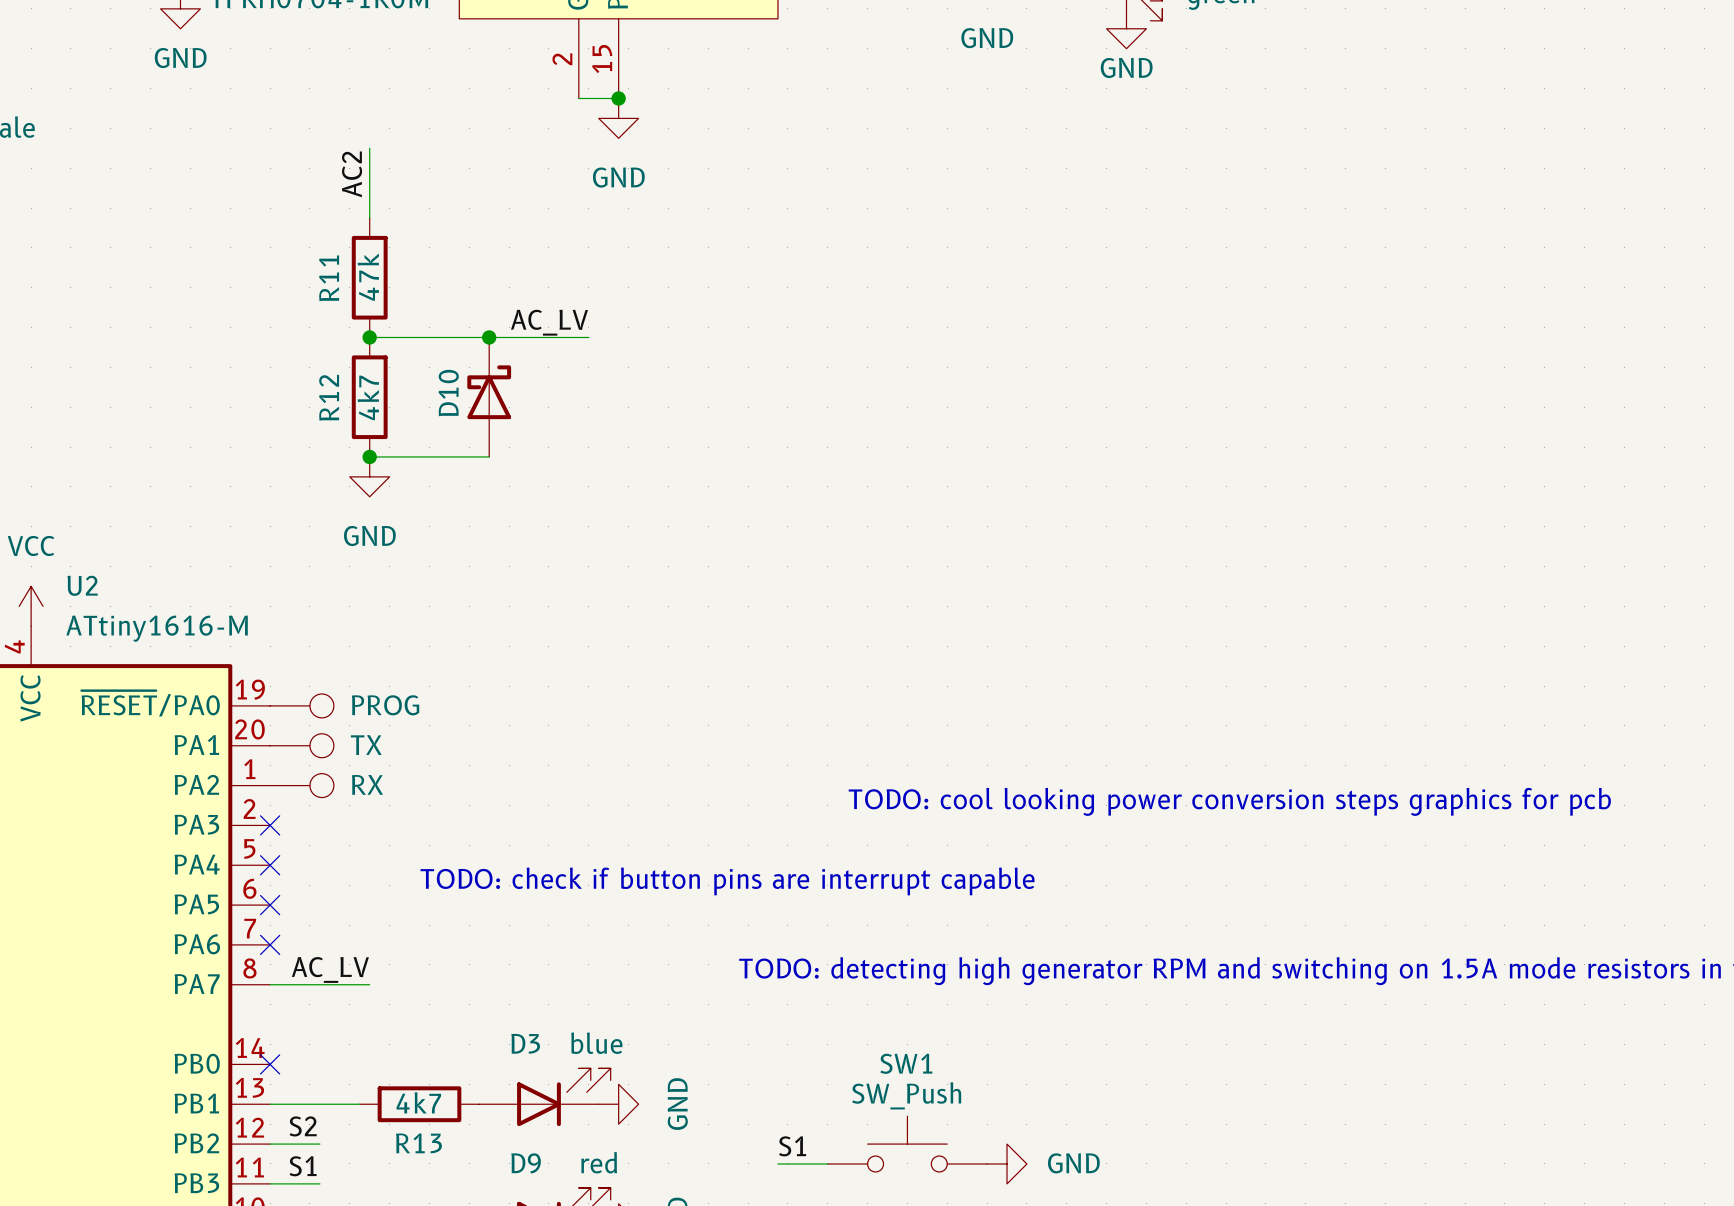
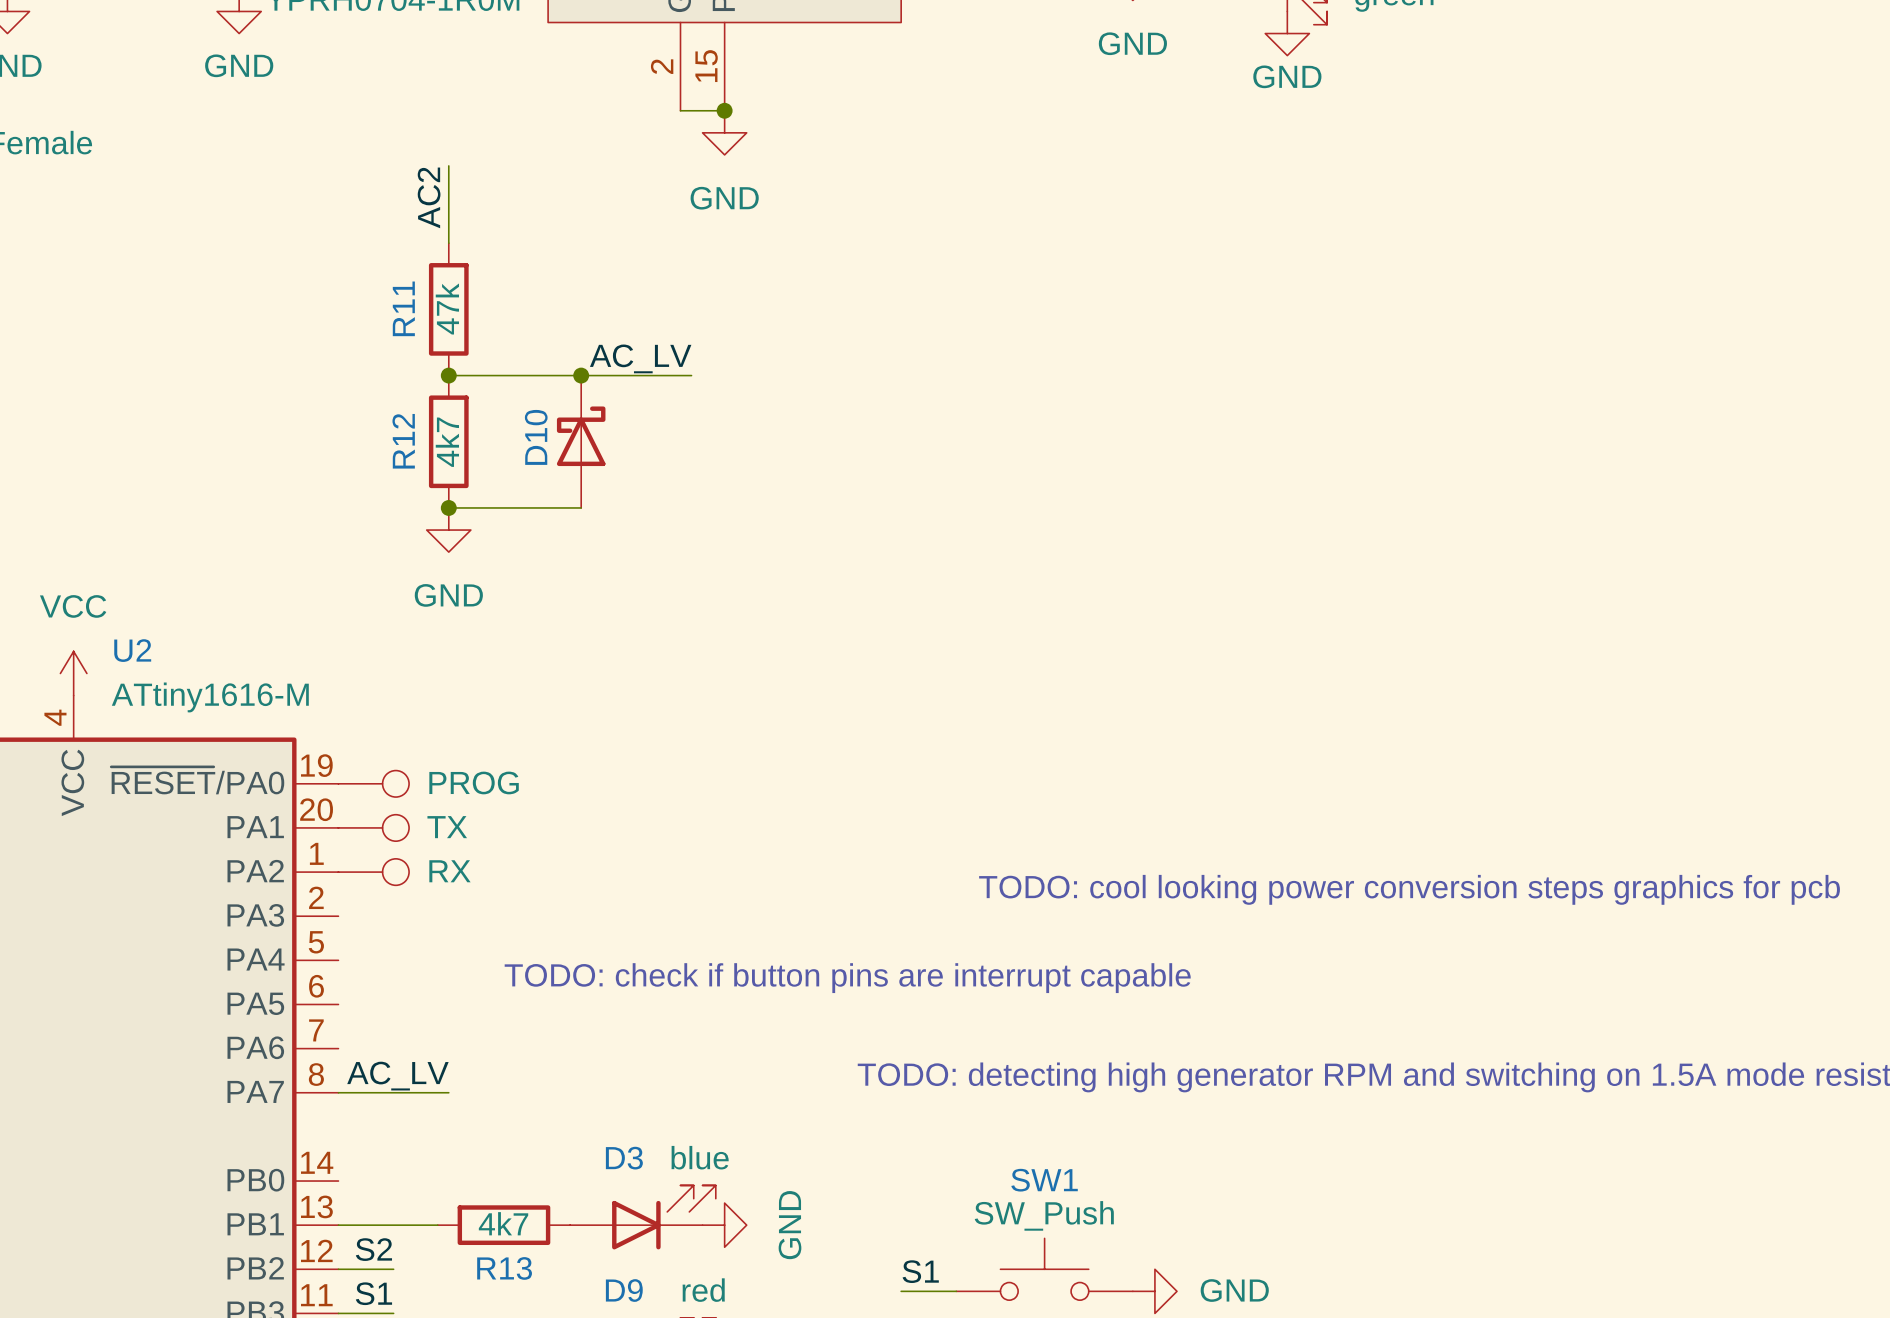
no-connect mark: (270, 825) -> none
no-connect mark: (270, 865) -> none
no-connect mark: (270, 905) -> none
no-connect mark: (270, 944) -> none
no-connect mark: (270, 1064) -> none

